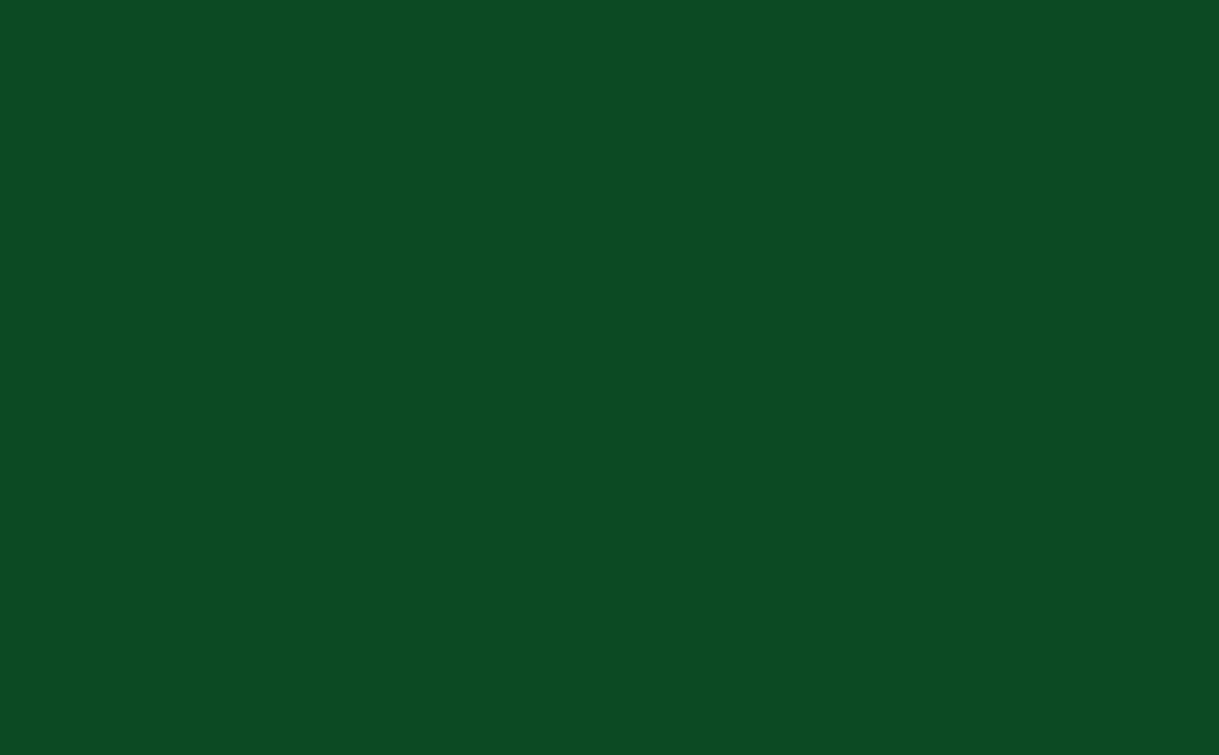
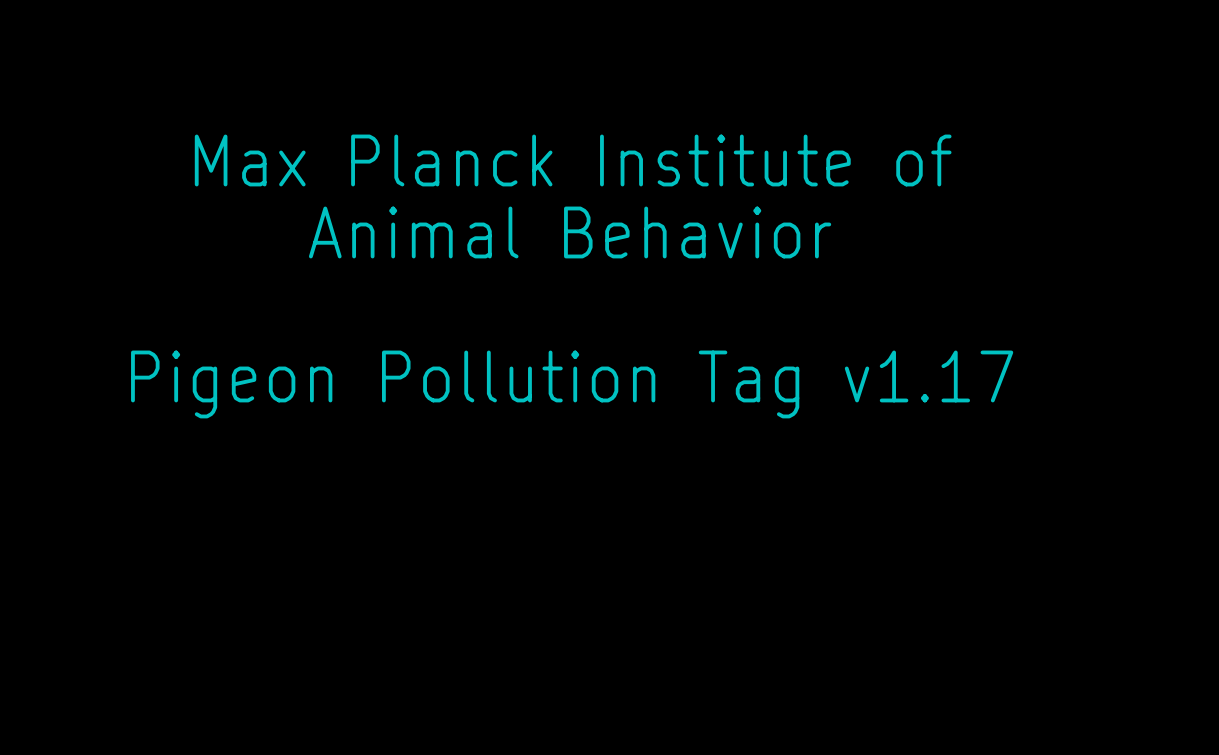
text: none -> Max Planck Institute of (573, 160)
text: none -> Animal Behavior (570, 232)
text: none -> Pigeon Pollution Tag v1.17 (572, 384)

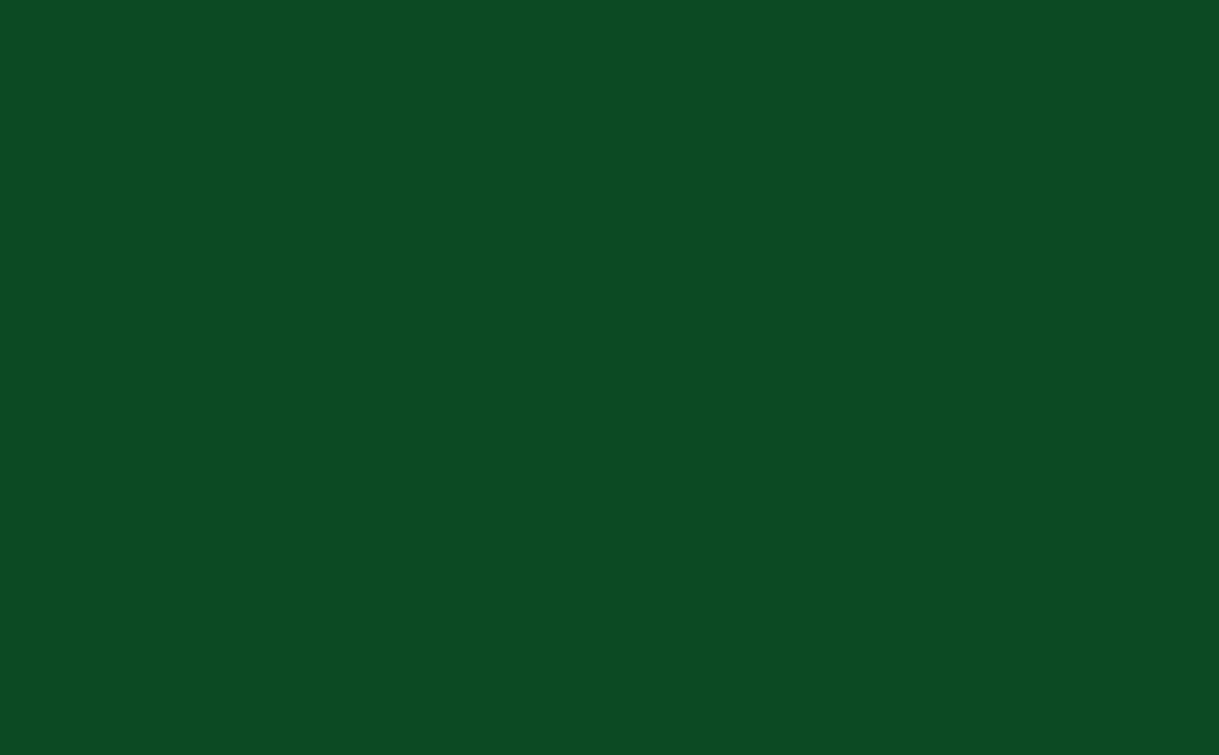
text: Max Planck Institute of (573, 160) -> none
text: Animal Behavior (570, 232) -> none
text: Pigeon Pollution Tag v1.17 (572, 384) -> none

